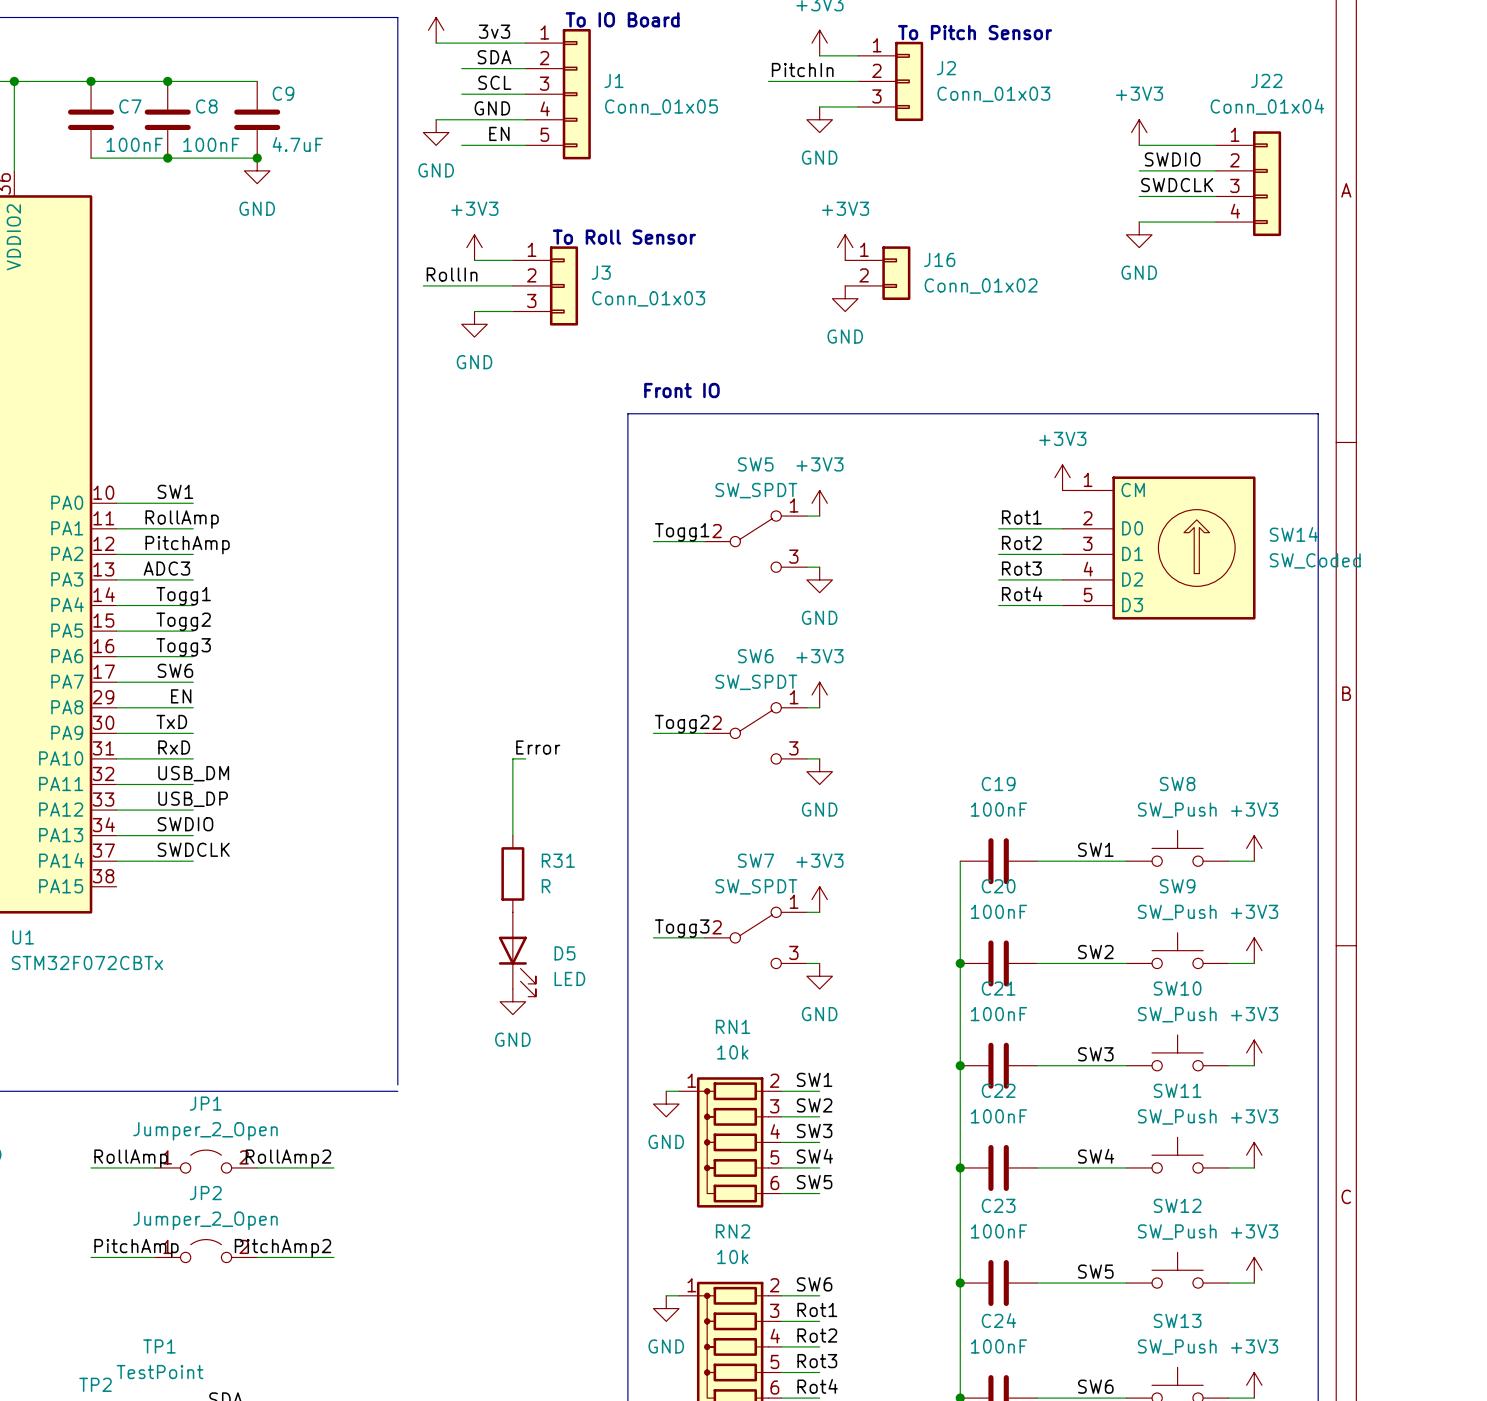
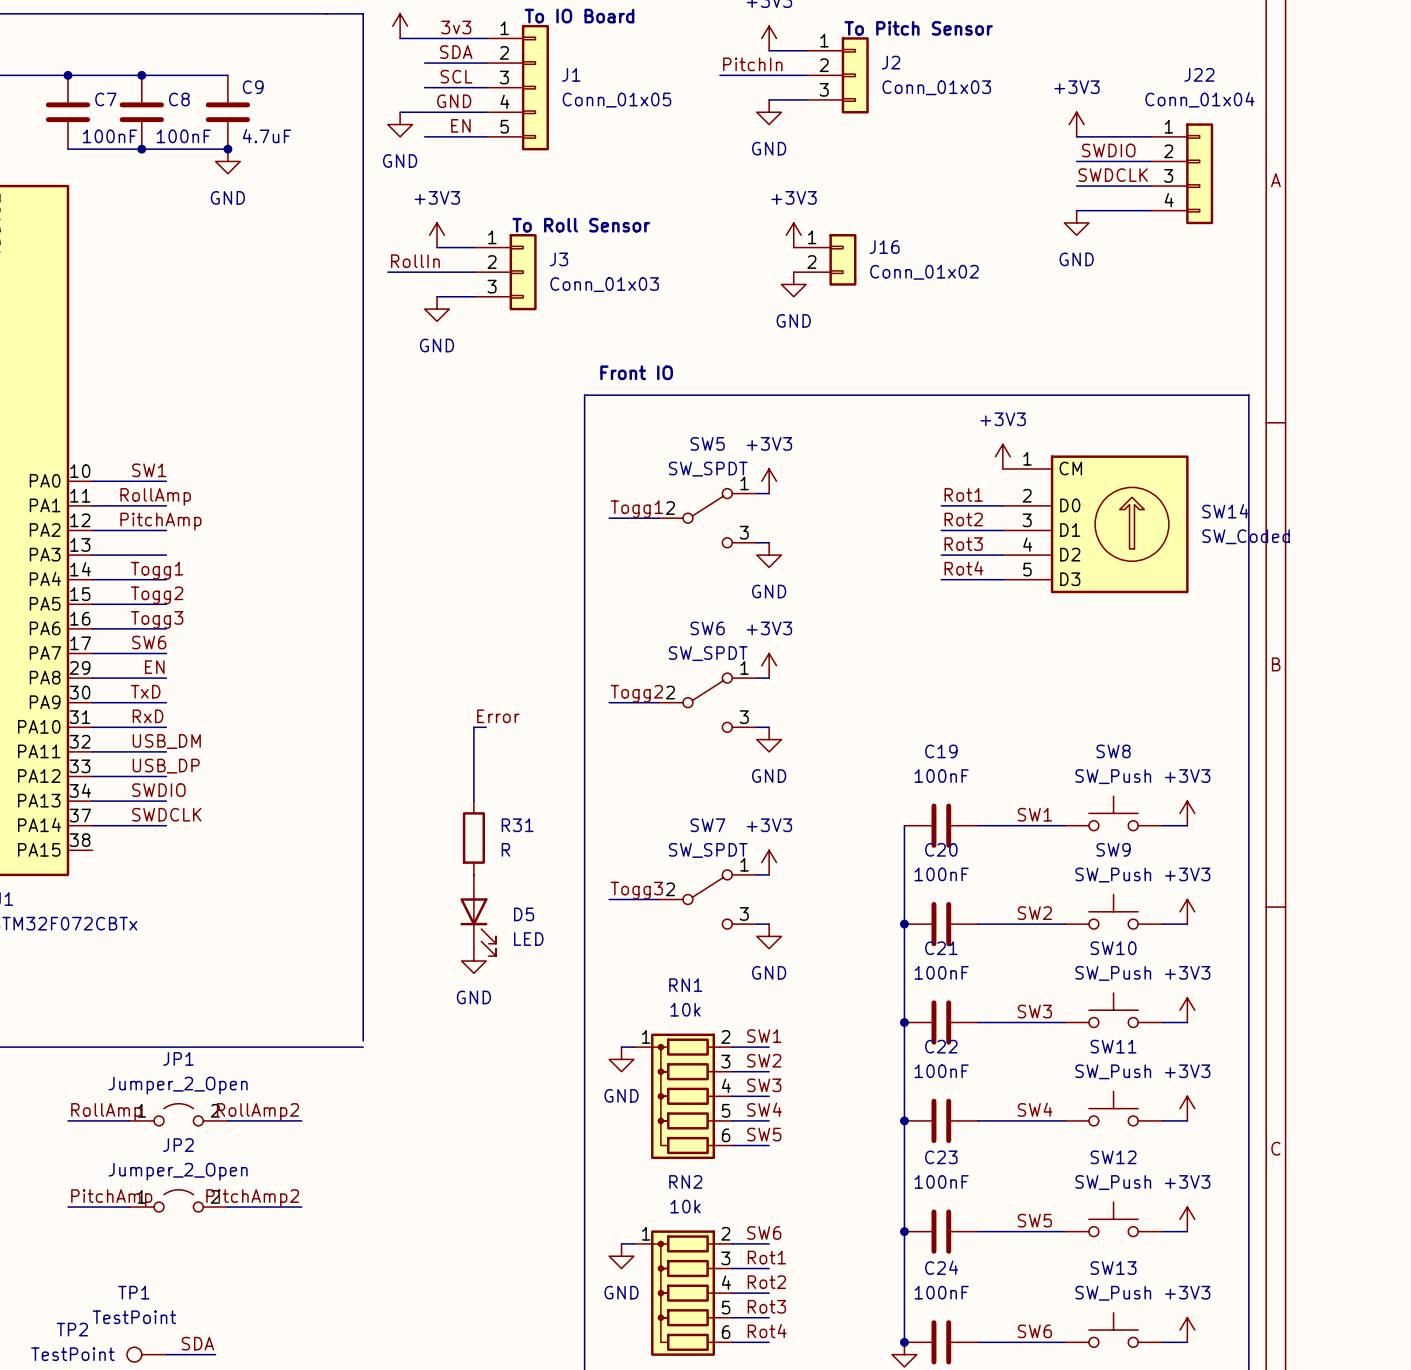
label: ADC3 (166, 568) -> none

